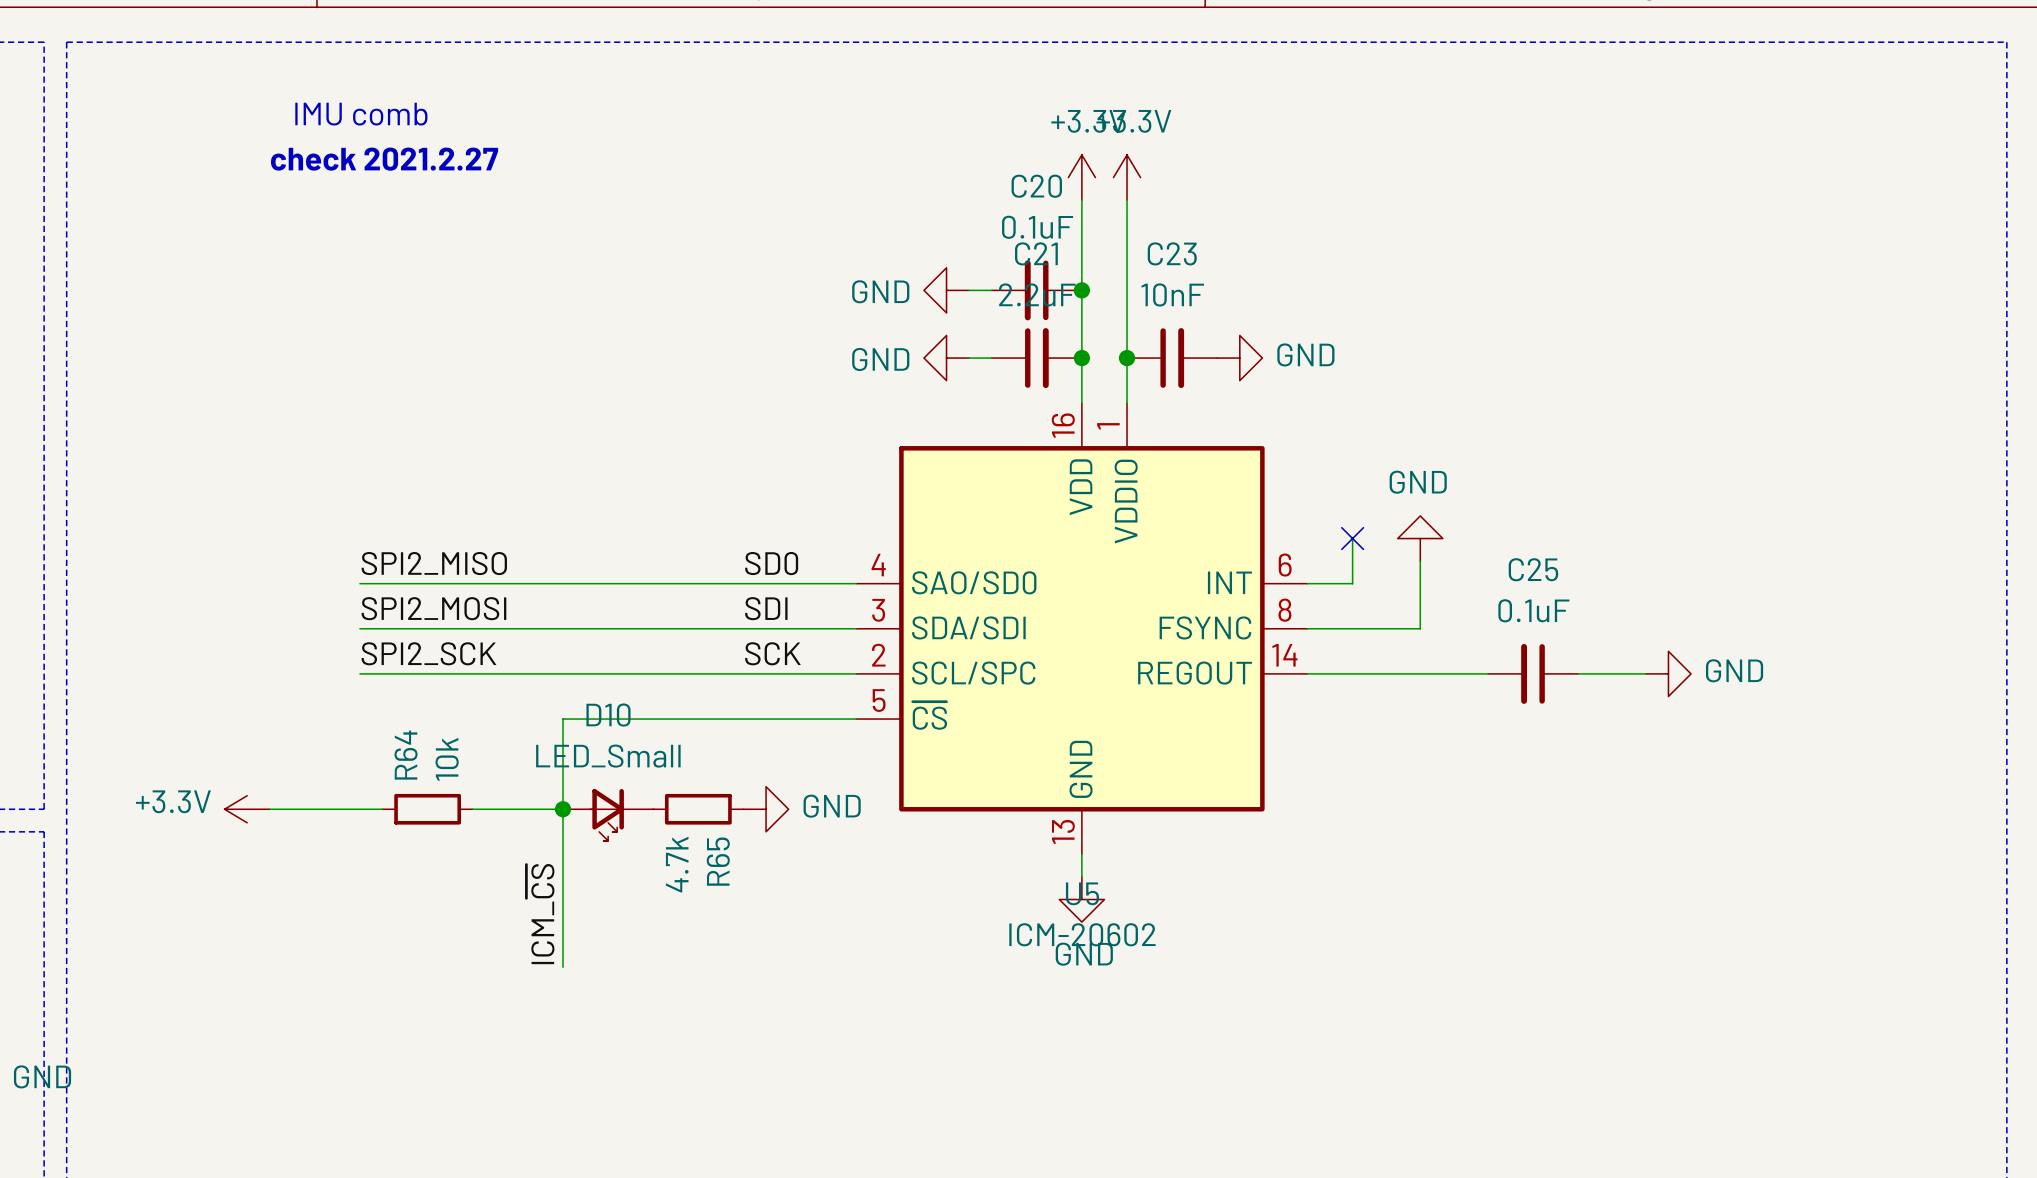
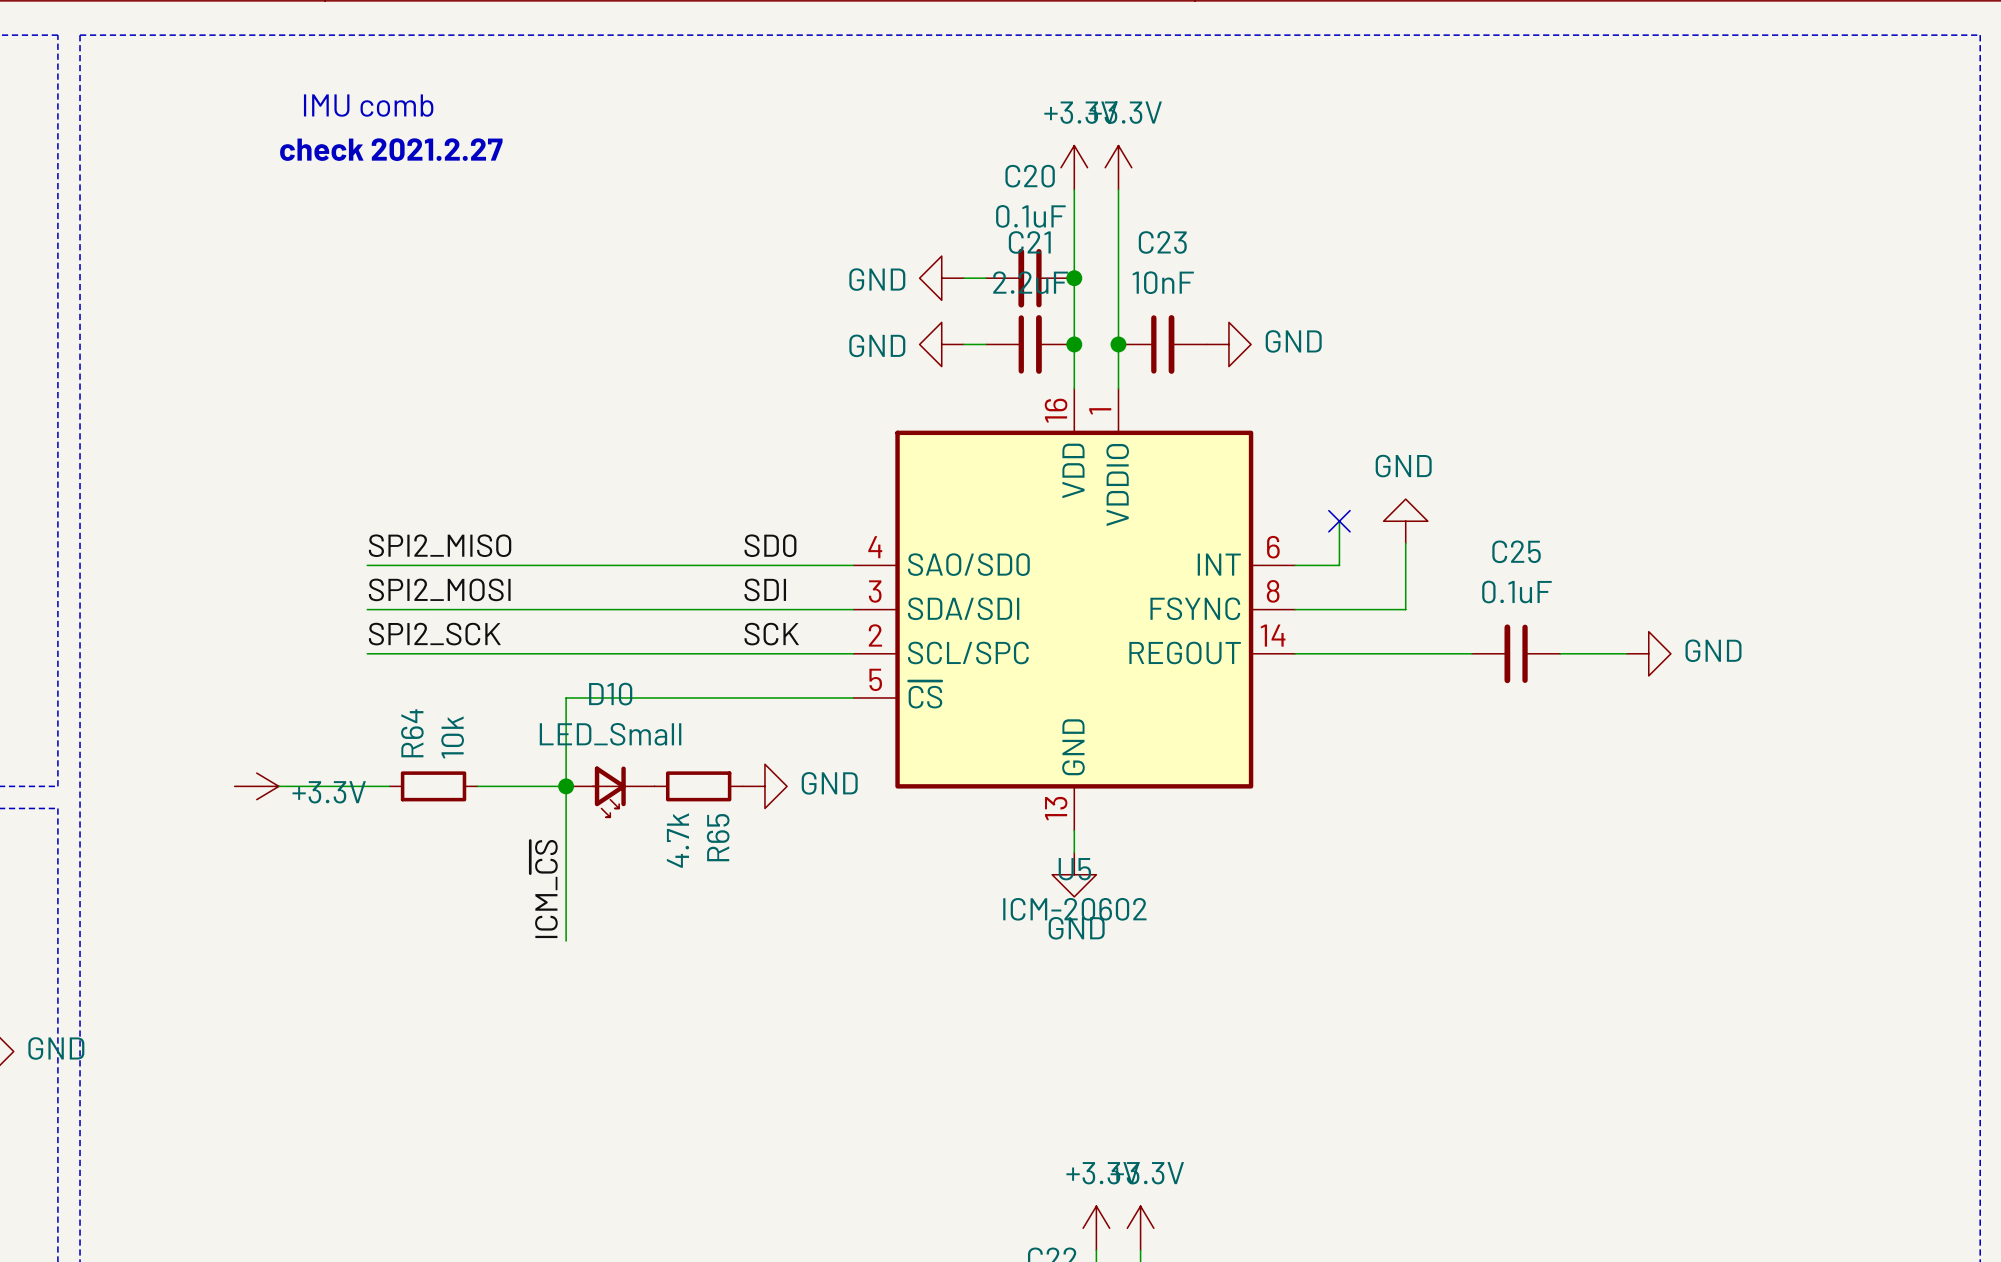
power symbol rotation: 0° (247, 809) -> 180° (256, 786)

